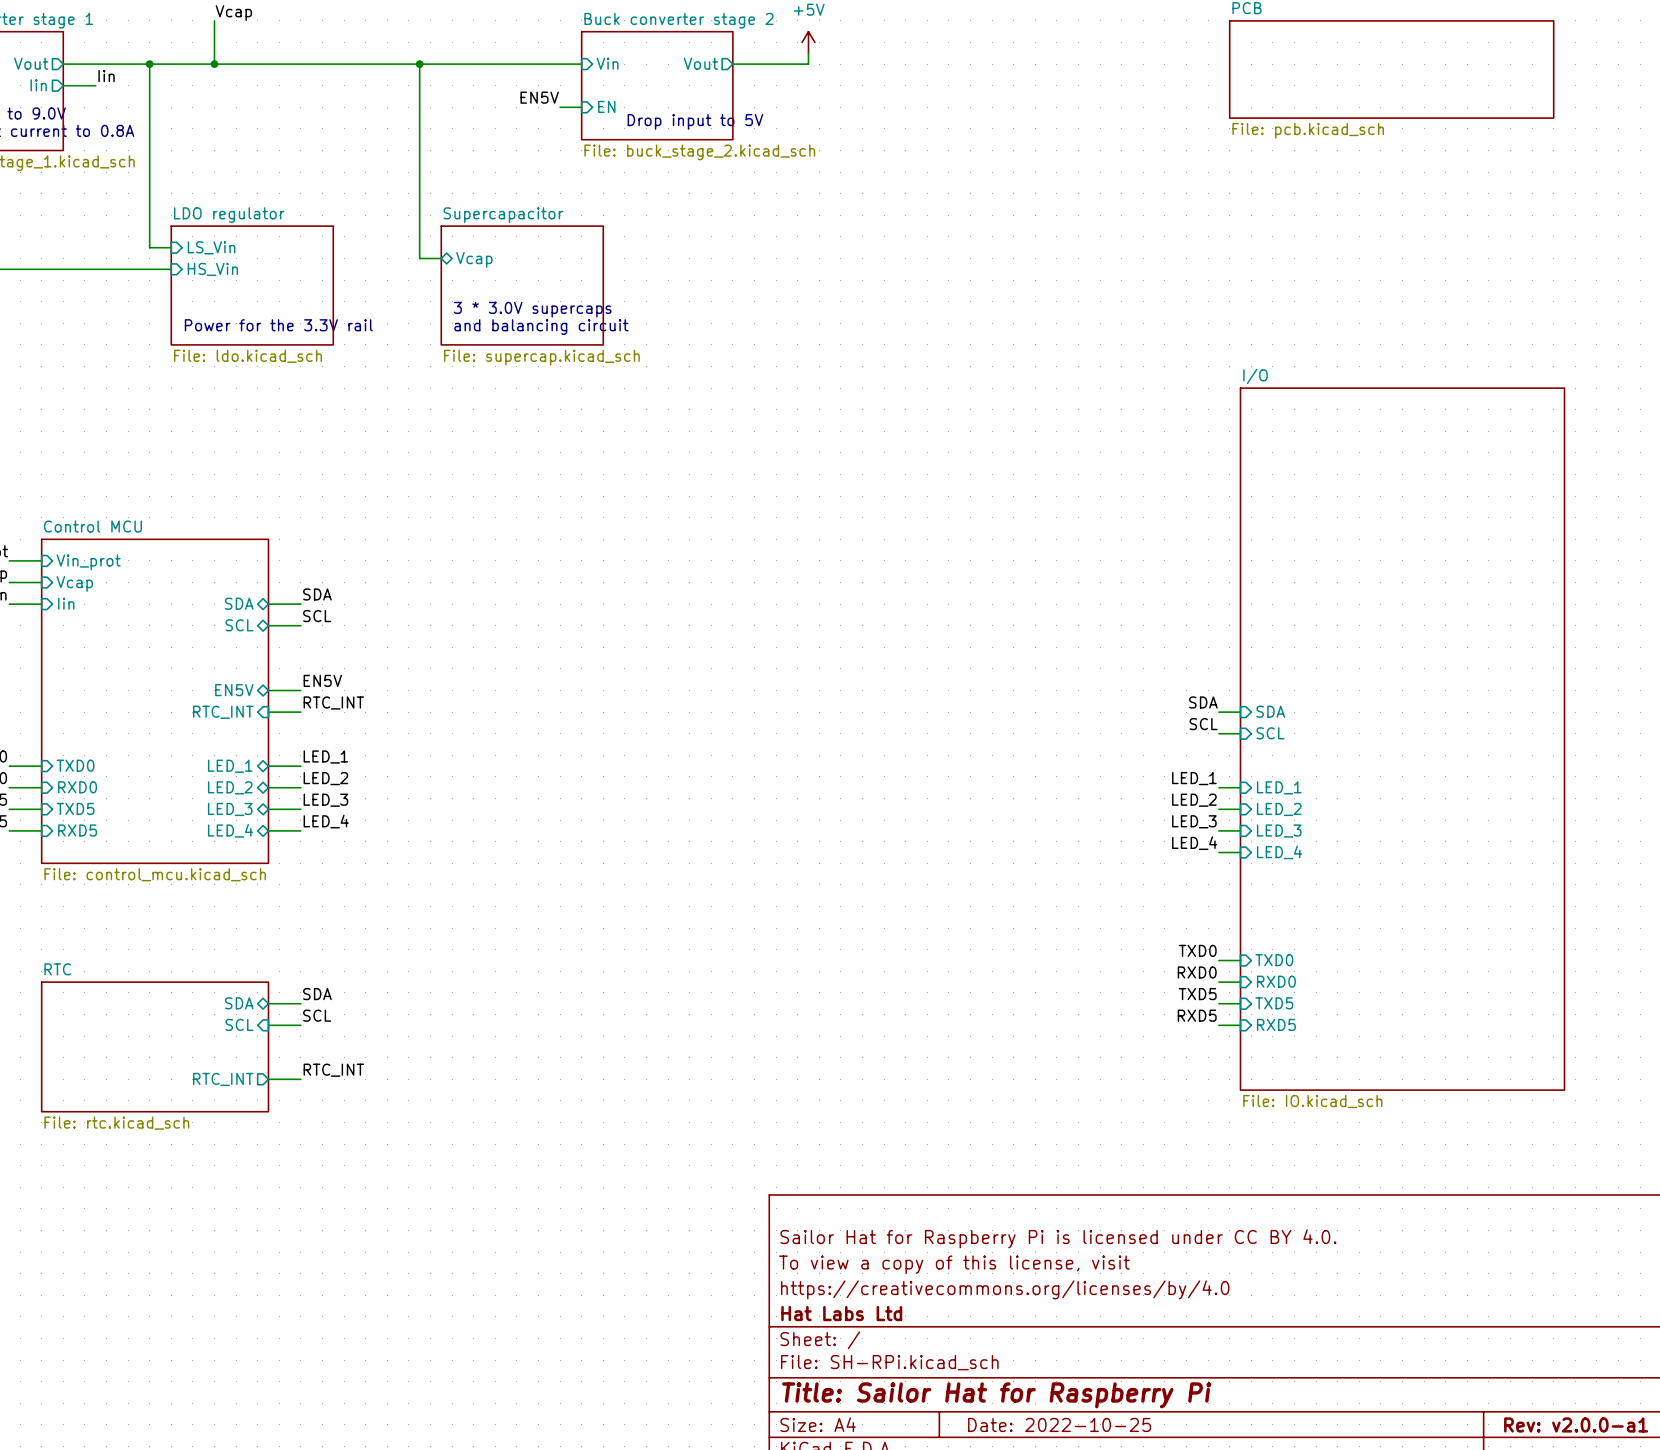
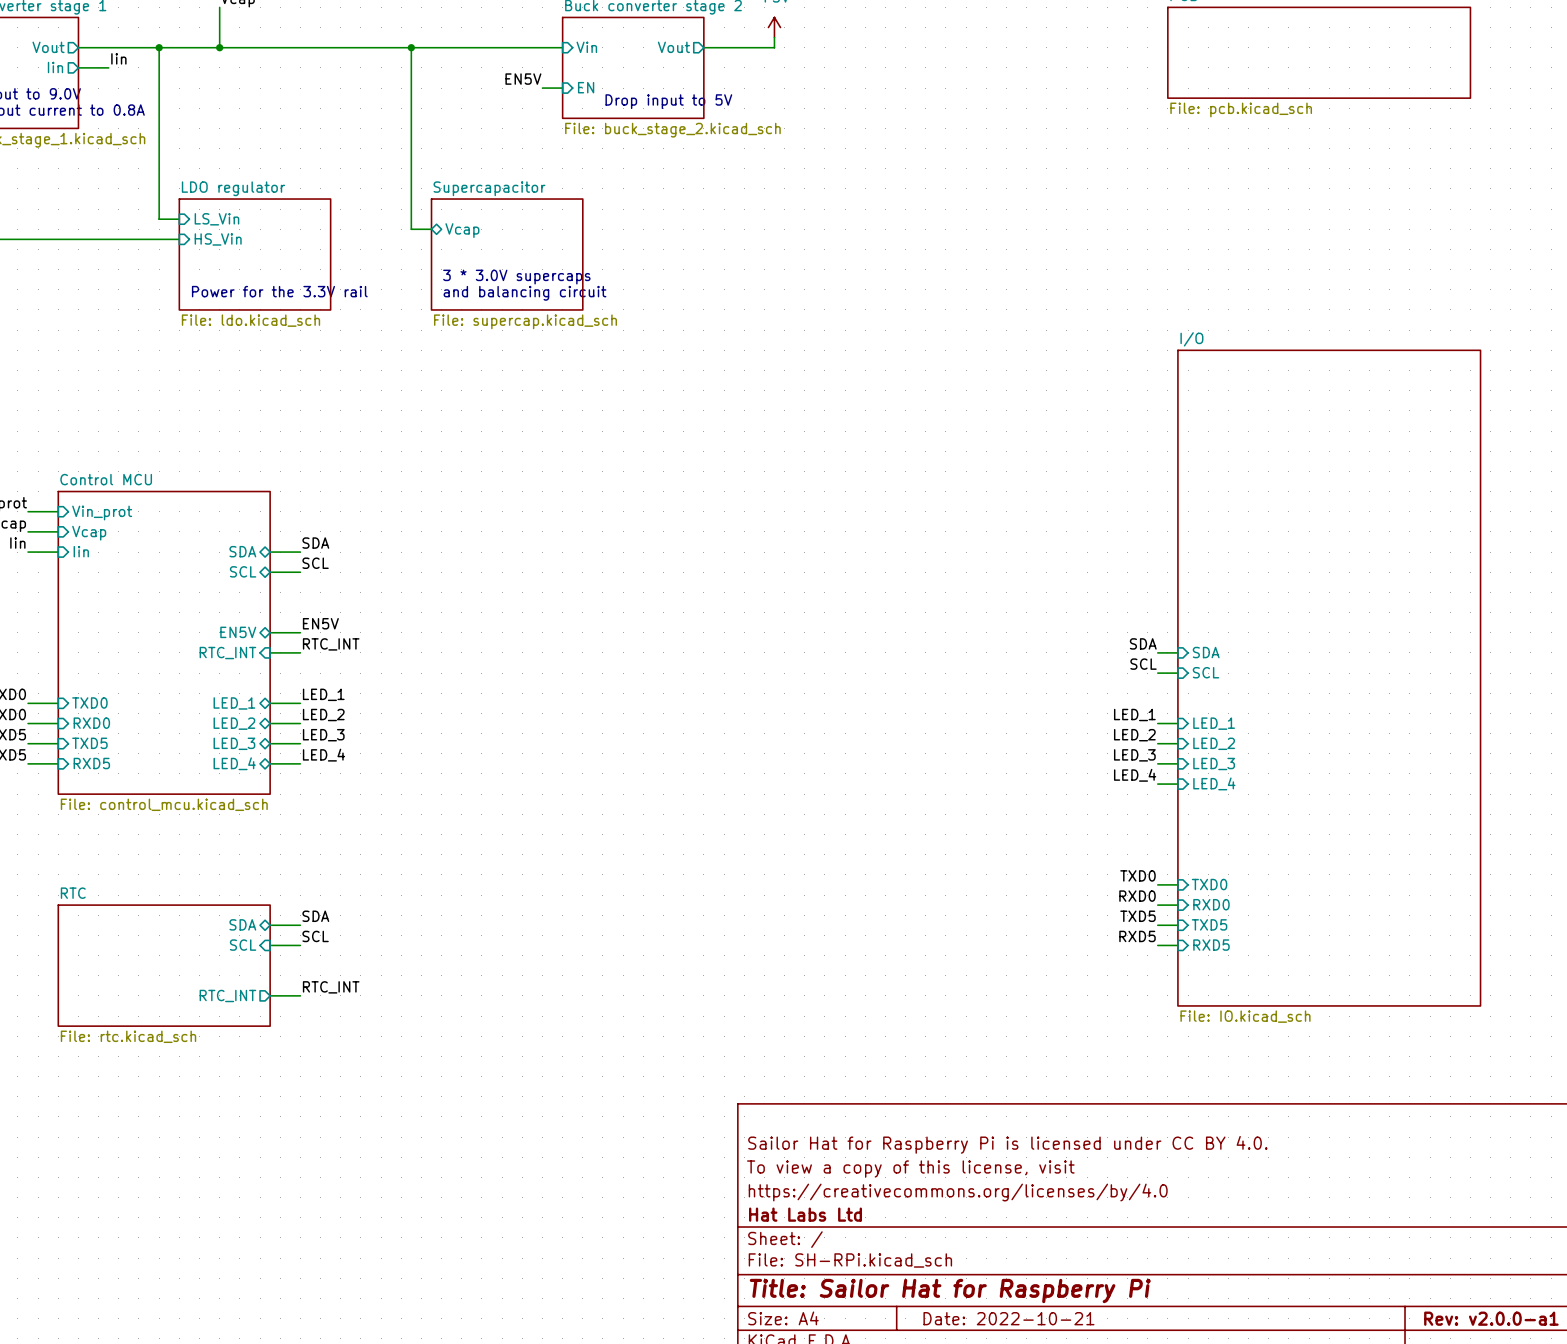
title block: Date: 2022-10-25 (1059, 1424) -> Date: 2022-10-21 (1008, 1318)

